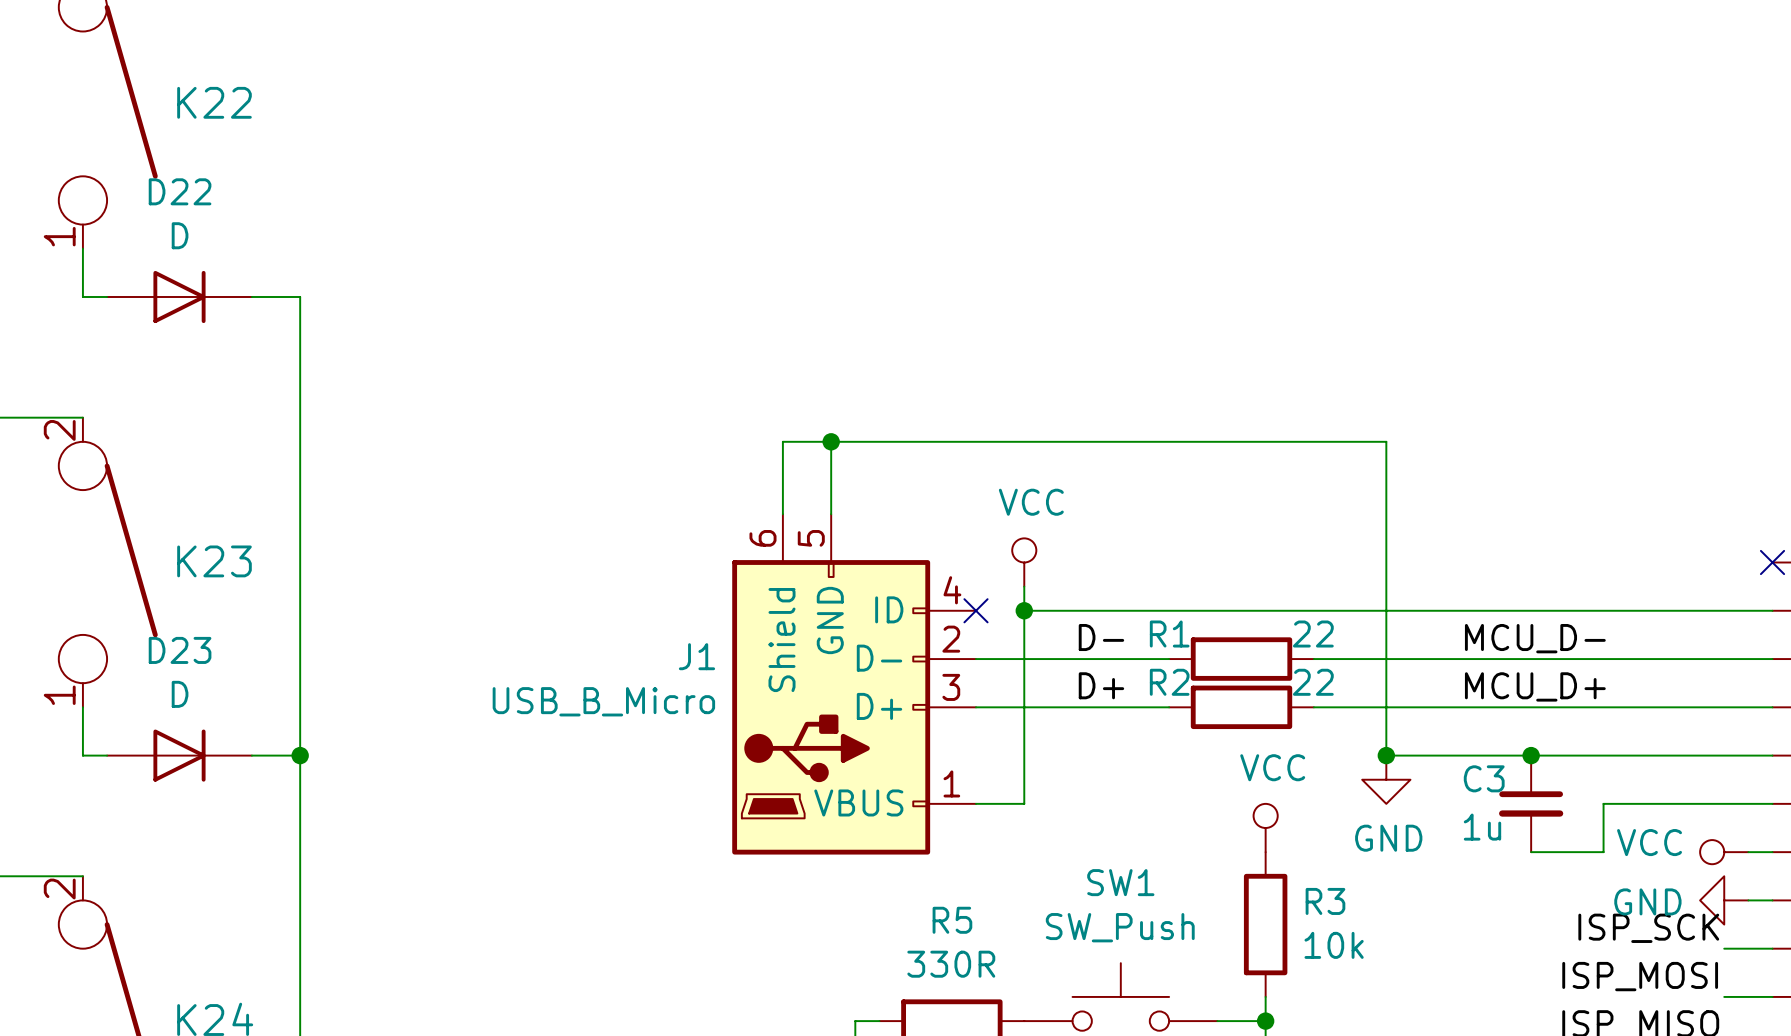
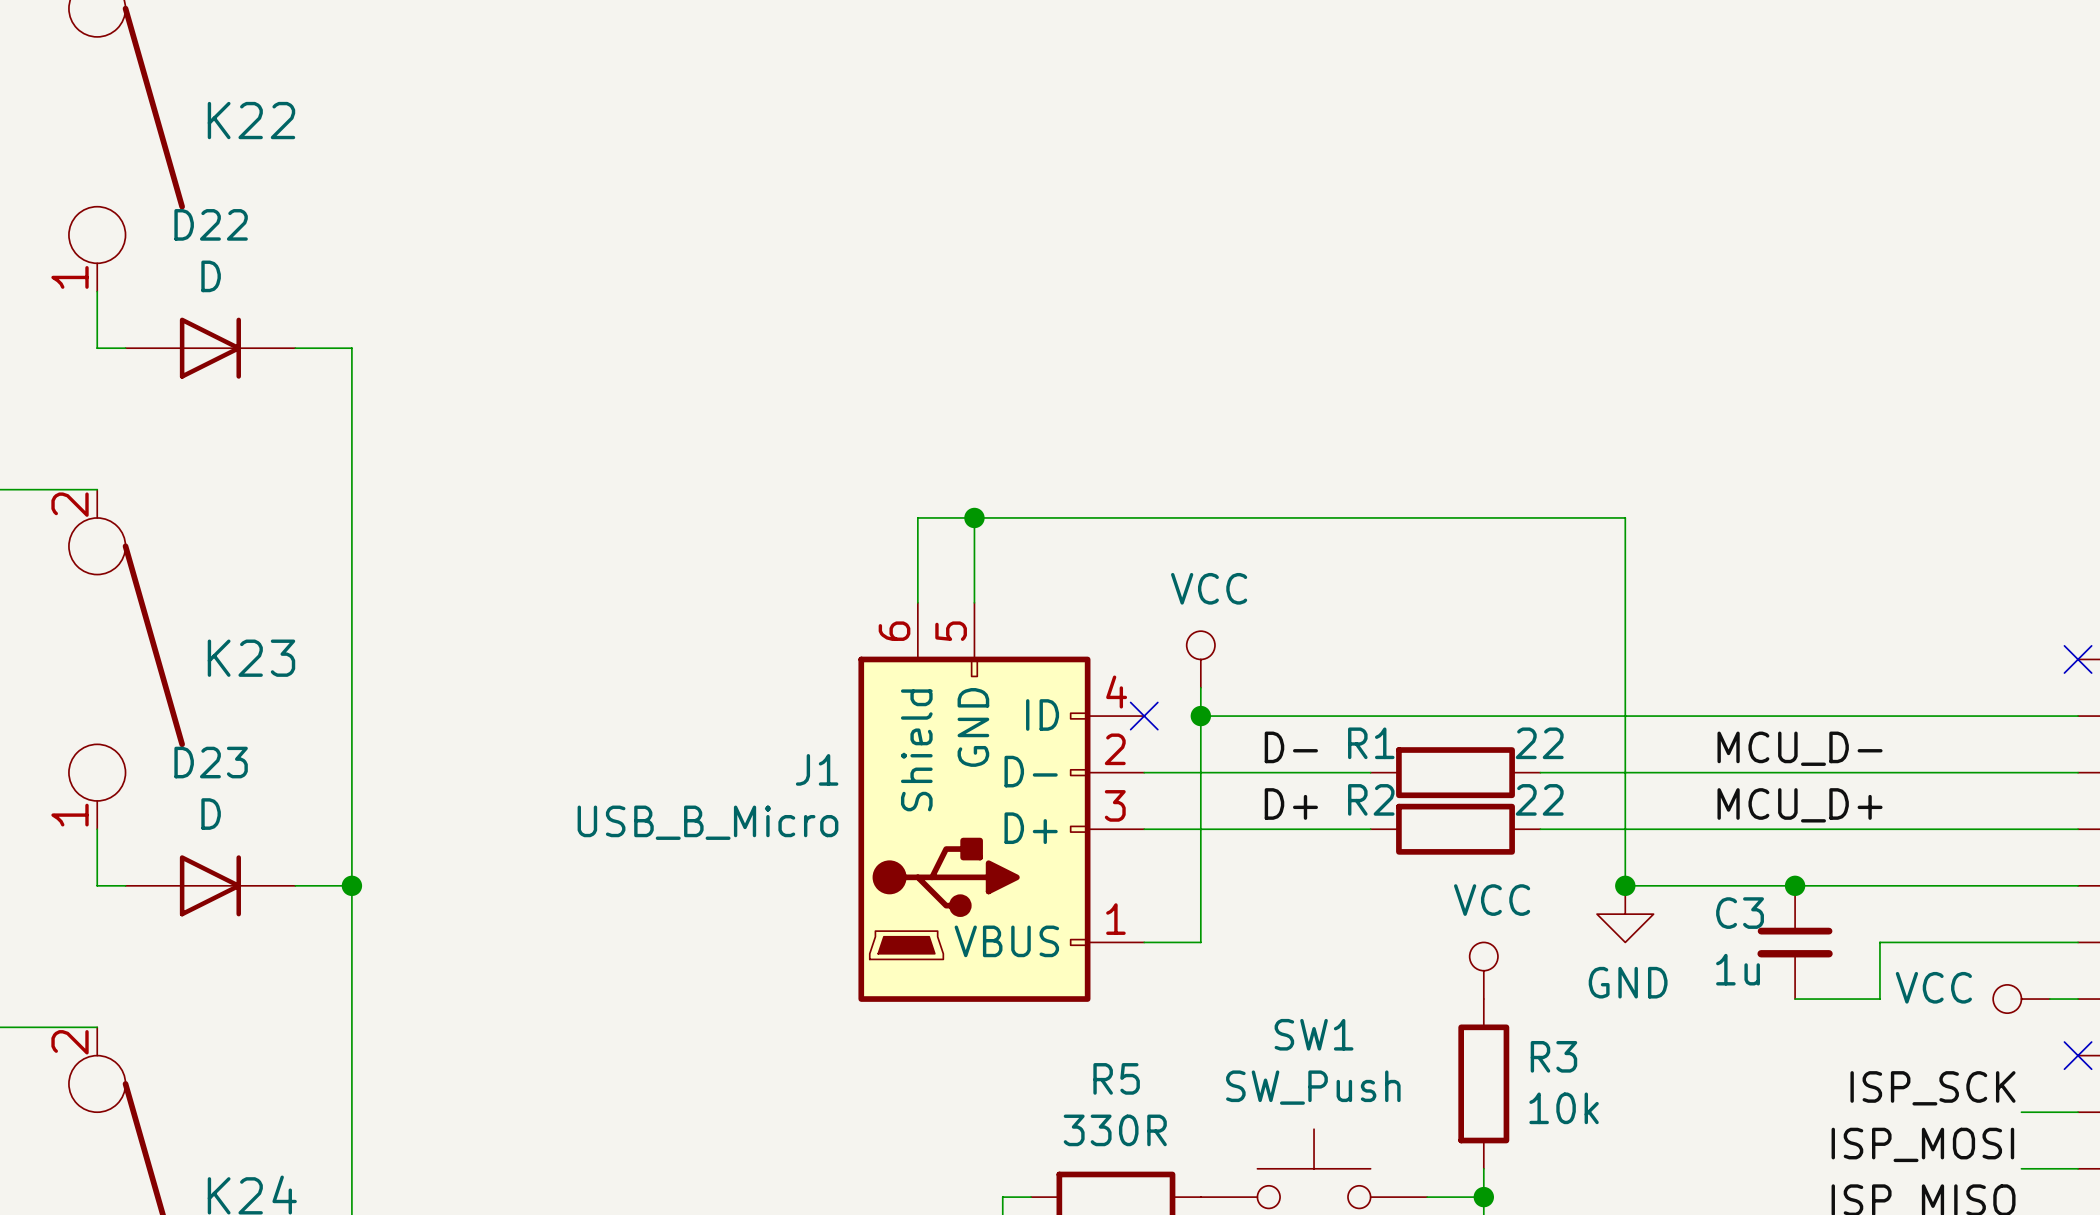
power symbol: GND (1724, 900) -> none
wire: (1748, 900) (1772, 900) -> none
no-connect mark: none -> (2078, 1055)

